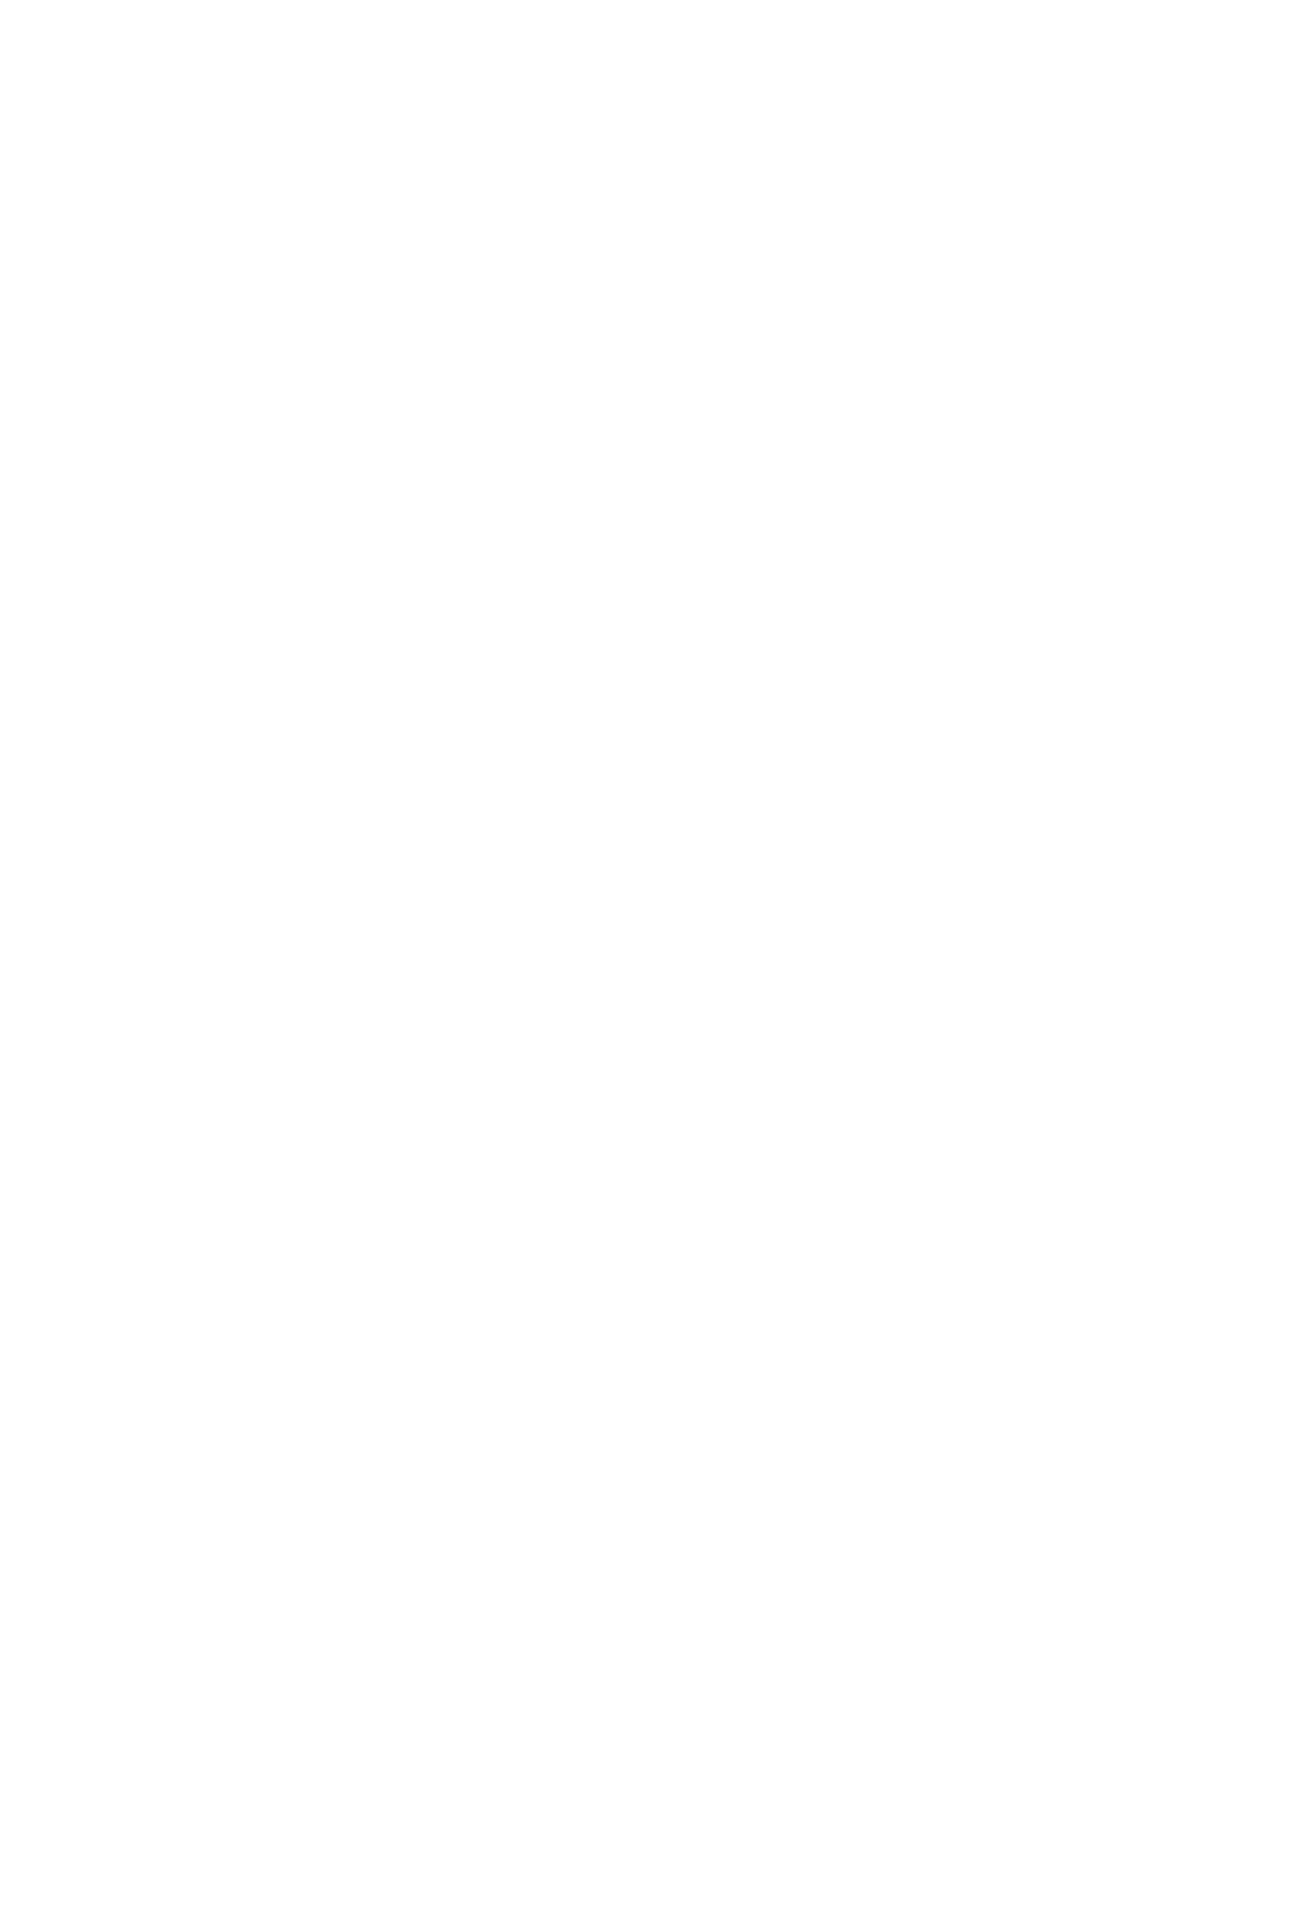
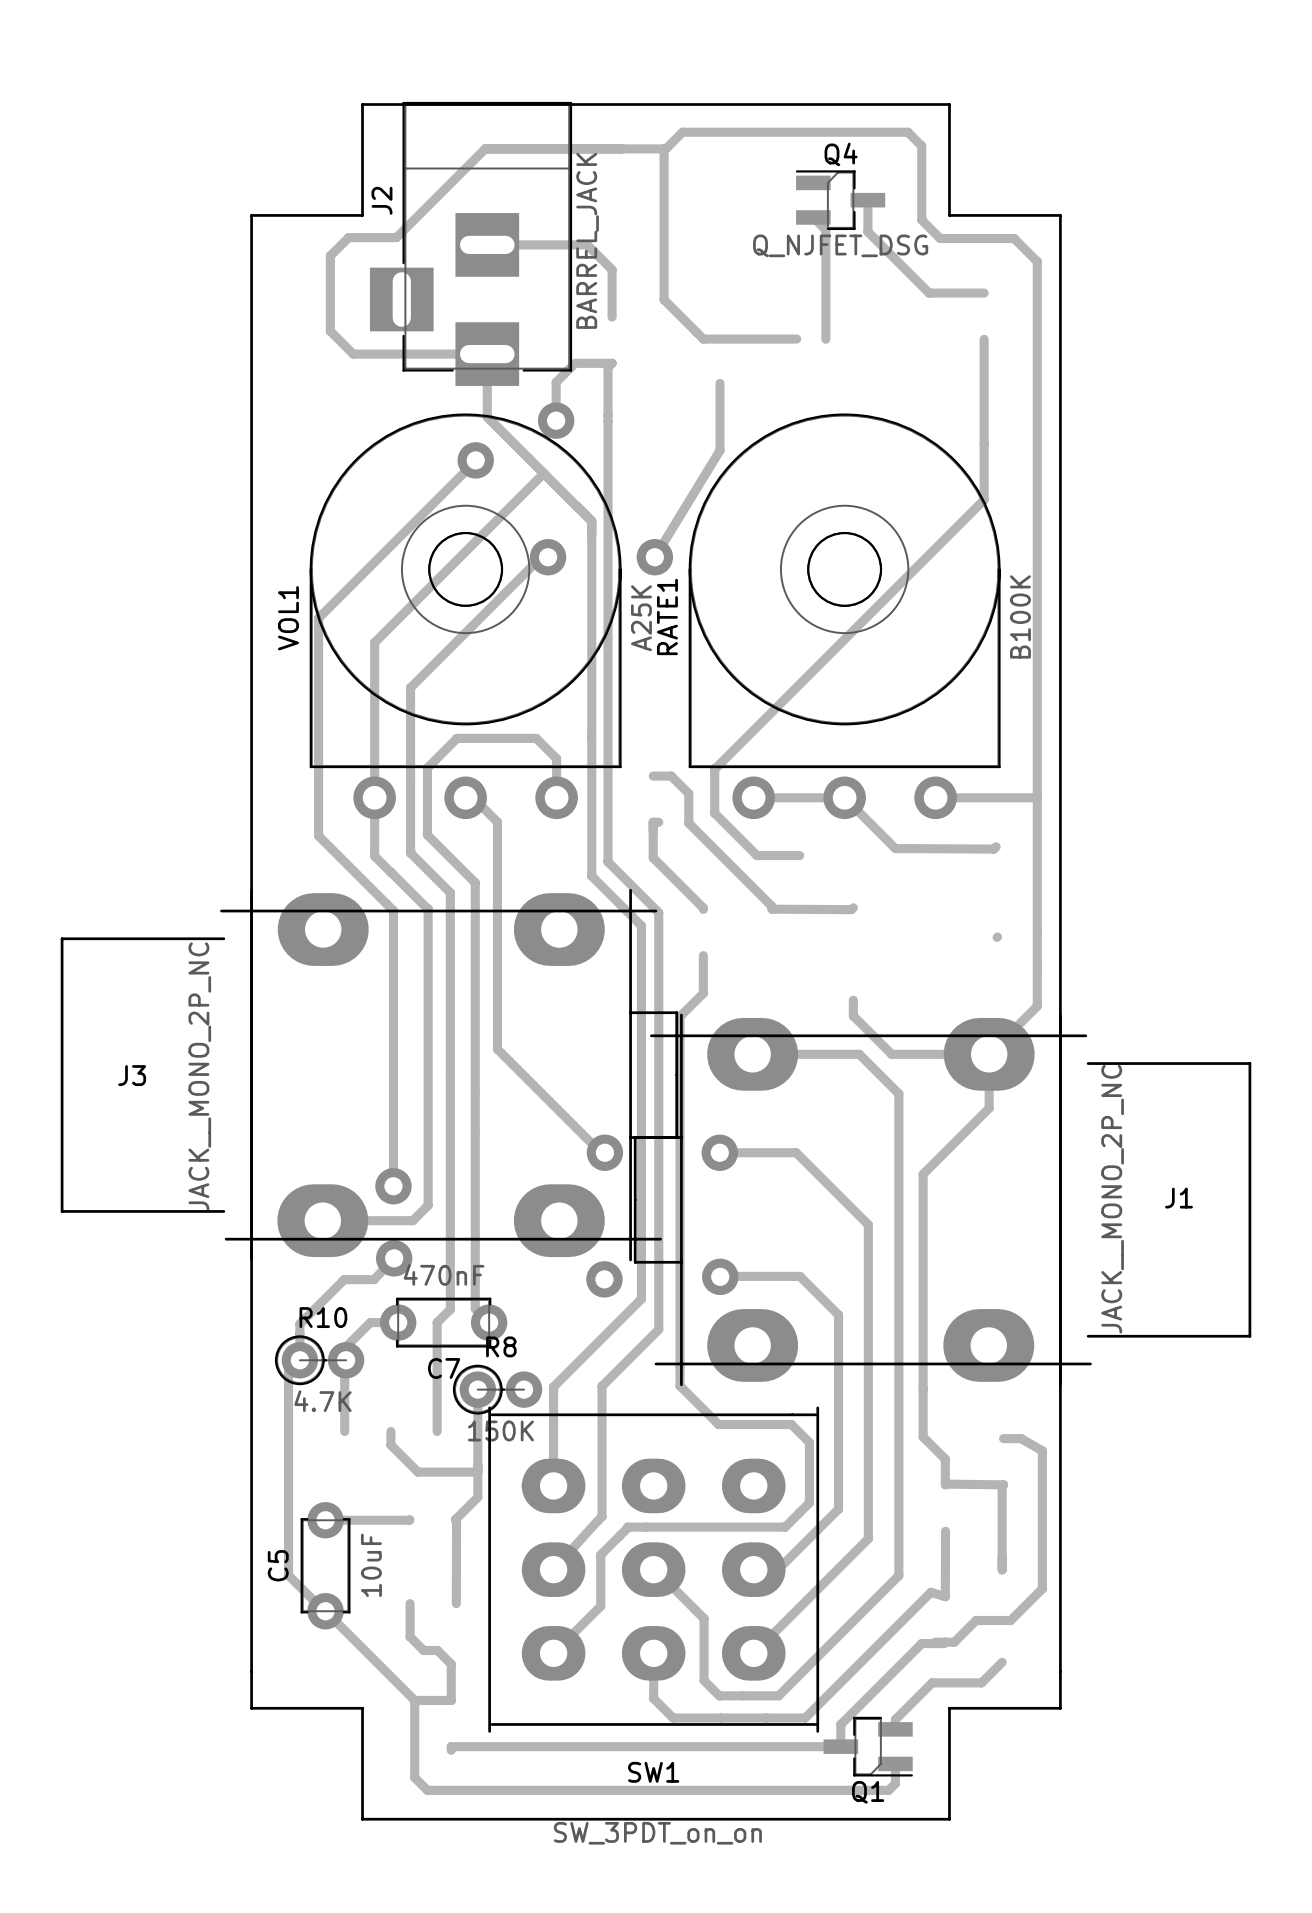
board edge: none -> (362, 104) (362, 215) (251, 215) (251, 1708) (362, 1708) (362, 1819) (949, 1819) (949, 1708) (1060, 1708) (1060, 215) (949, 215) (949, 104) (362, 104)
track: none -> (664, 148) (664, 299) (703, 339) (796, 339)
Q4: none -> Q_NJFET_DSG (840, 200)
track: none -> (867, 200) (867, 231) (929, 293) (984, 293)
track: none -> (813, 217) (825, 229) (825, 339)
J2: none -> BARREL_JACK (471, 243)
track: none -> (487, 244) (587, 244) (612, 269) (612, 317)
track: none -> (984, 339) (984, 499) (714, 768) (714, 813) (756, 855) (799, 855)
track: none -> (720, 383) (720, 450) (654, 557)
track: none -> (556, 420) (556, 382) (575, 363) (612, 363) (608, 367) (608, 861) (658, 912) (658, 1329) (602, 1386) (602, 1516) (553, 1569)
via: none -> (556, 420)
track: none -> (475, 460) (318, 618) (318, 835) (393, 910) (393, 1186)
via: none -> (475, 460)
track: none -> (543, 473) (374, 642) (374, 856) (390, 872)
track: none -> (577, 507) (591, 520) (591, 876) (641, 925) (641, 1299) (553, 1386) (553, 1485) (525, 1485)
track: none -> (591, 521) (487, 416) (487, 354) (353, 354) (330, 331) (330, 255) (348, 237) (396, 237) (485, 148) (665, 148) (682, 132) (907, 132) (921, 146) (921, 220) (940, 238) (1014, 238) (1037, 261) (1037, 1006) (989, 1054)
track: none -> (548, 557) (541, 557) (410, 687) (410, 853) (450, 892) (450, 1309) (437, 1322) (437, 1431)
via: none -> (548, 557)
via: none -> (654, 557)
VOL1: none -> A25K (465, 616)
RATE1: none -> B100K (844, 616)
track: none -> (653, 776) (671, 776) (688, 793) (688, 823) (772, 906) (772, 909) (851, 909) (853, 907)
track: none -> (465, 797) (473, 797) (497, 822) (497, 1049) (600, 1152) (604, 1152)
track: none -> (556, 797) (556, 758) (536, 738) (457, 738) (427, 767) (427, 835) (475, 882) (475, 1308) (489, 1322)
track: none -> (753, 797) (844, 797) (895, 848) (993, 849) (996, 846)
track: none -> (935, 797) (1037, 797)
track: none -> (658, 822) (653, 822) (653, 857) (703, 909)
track: none -> (390, 872) (428, 908) (428, 1205) (412, 1220) (322, 1220) (315, 1228)
track: none -> (997, 936) (997, 937)
track: none -> (703, 955) (703, 993) (680, 1016) (680, 1385) (718, 1424) (791, 1424) (809, 1442) (809, 1502) (785, 1527) (627, 1527) (600, 1554) (600, 1606) (553, 1653)
track: none -> (853, 1000) (853, 1015) (891, 1054) (989, 1054)
track: none -> (752, 1054) (859, 1054) (898, 1093) (898, 1575) (778, 1695) (719, 1695) (704, 1680) (704, 1618) (653, 1569)
track: none -> (989, 1054) (989, 1108) (923, 1174) (923, 1436) (945, 1459) (945, 1484) (1003, 1484) (1002, 1569)
J3: none -> JACK__MONO_2P_NC (369, 1075)
via: none -> (604, 1152)
track: none -> (719, 1152) (796, 1152) (868, 1224) (868, 1538) (753, 1653)
via: none -> (719, 1152)
via: none -> (393, 1186)
J1: none -> JACK__MONO_2P_NC (942, 1199)
track: none -> (394, 1258) (374, 1279) (344, 1279) (299, 1323) (299, 1360) (288, 1371) (288, 1575) (414, 1700)
via: none -> (394, 1258)
track: none -> (720, 1276) (799, 1276) (838, 1314) (838, 1509) (778, 1569) (753, 1569)
via: none -> (720, 1276)
via: none -> (604, 1279)
C7: none -> 470nF (443, 1322)
track: none -> (399, 1323) (370, 1322) (346, 1346) (344, 1431)
R10: none -> 4.7K (319, 1360)
track: none -> (479, 1389) (477, 1389) (477, 1497) (455, 1519) (456, 1603)
R8: none -> 150K (497, 1389)
track: none -> (390, 1431) (390, 1445) (417, 1472) (477, 1472)
track: none -> (1003, 1438) (1021, 1438) (1042, 1450) (1042, 1588) (1010, 1620) (976, 1620) (954, 1642) (935, 1642)
track: none -> (409, 1519) (325, 1520)
track: none -> (945, 1531) (945, 1596) (930, 1592) (805, 1718) (673, 1718) (653, 1698) (653, 1653) (657, 1653)
C5: none -> 10uF (325, 1565)
SW1: none -> SW_3PDT_on_on (653, 1569)
track: none -> (410, 1603) (410, 1636) (423, 1650) (437, 1650) (451, 1664) (451, 1700) (414, 1700)
track: none -> (945, 1642) (921, 1643) (840, 1724) (840, 1746) (451, 1746) (451, 1750)
track: none -> (1002, 1662) (981, 1682) (932, 1682) (895, 1719) (895, 1729)
track: none -> (414, 1700) (414, 1777) (427, 1790) (888, 1790) (895, 1783) (895, 1763) (884, 1763)
Q1: none -> (868, 1746)

